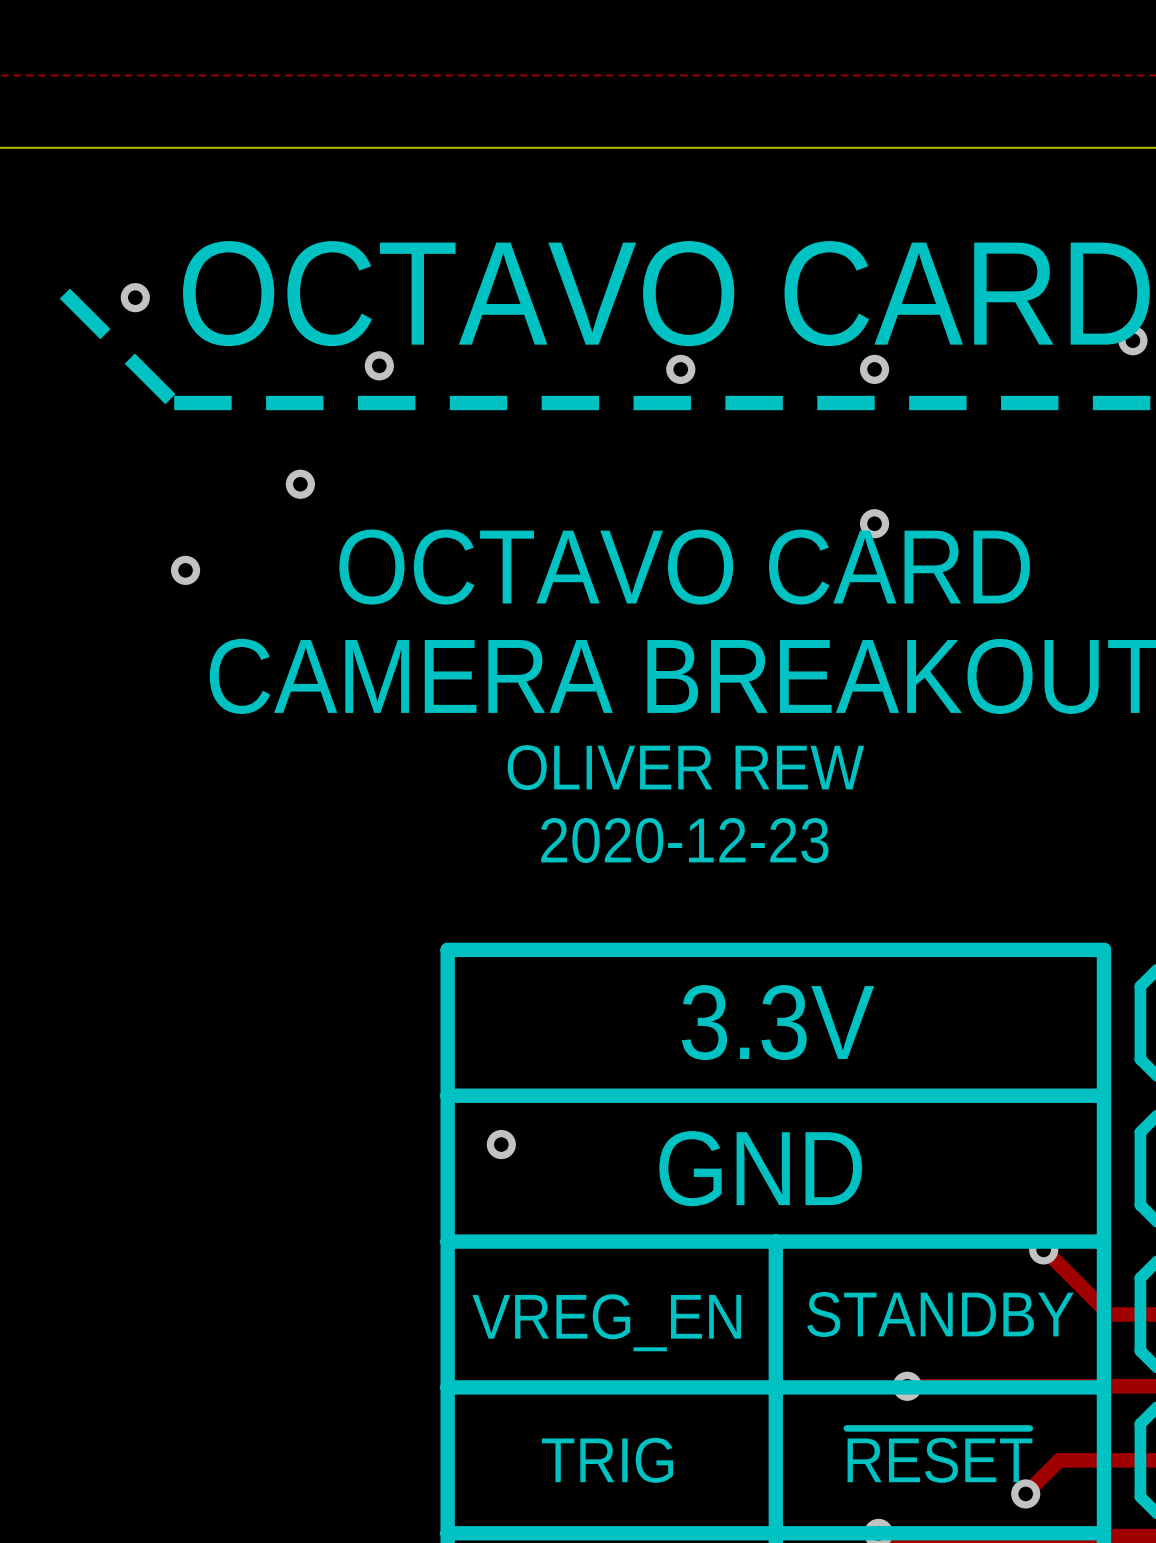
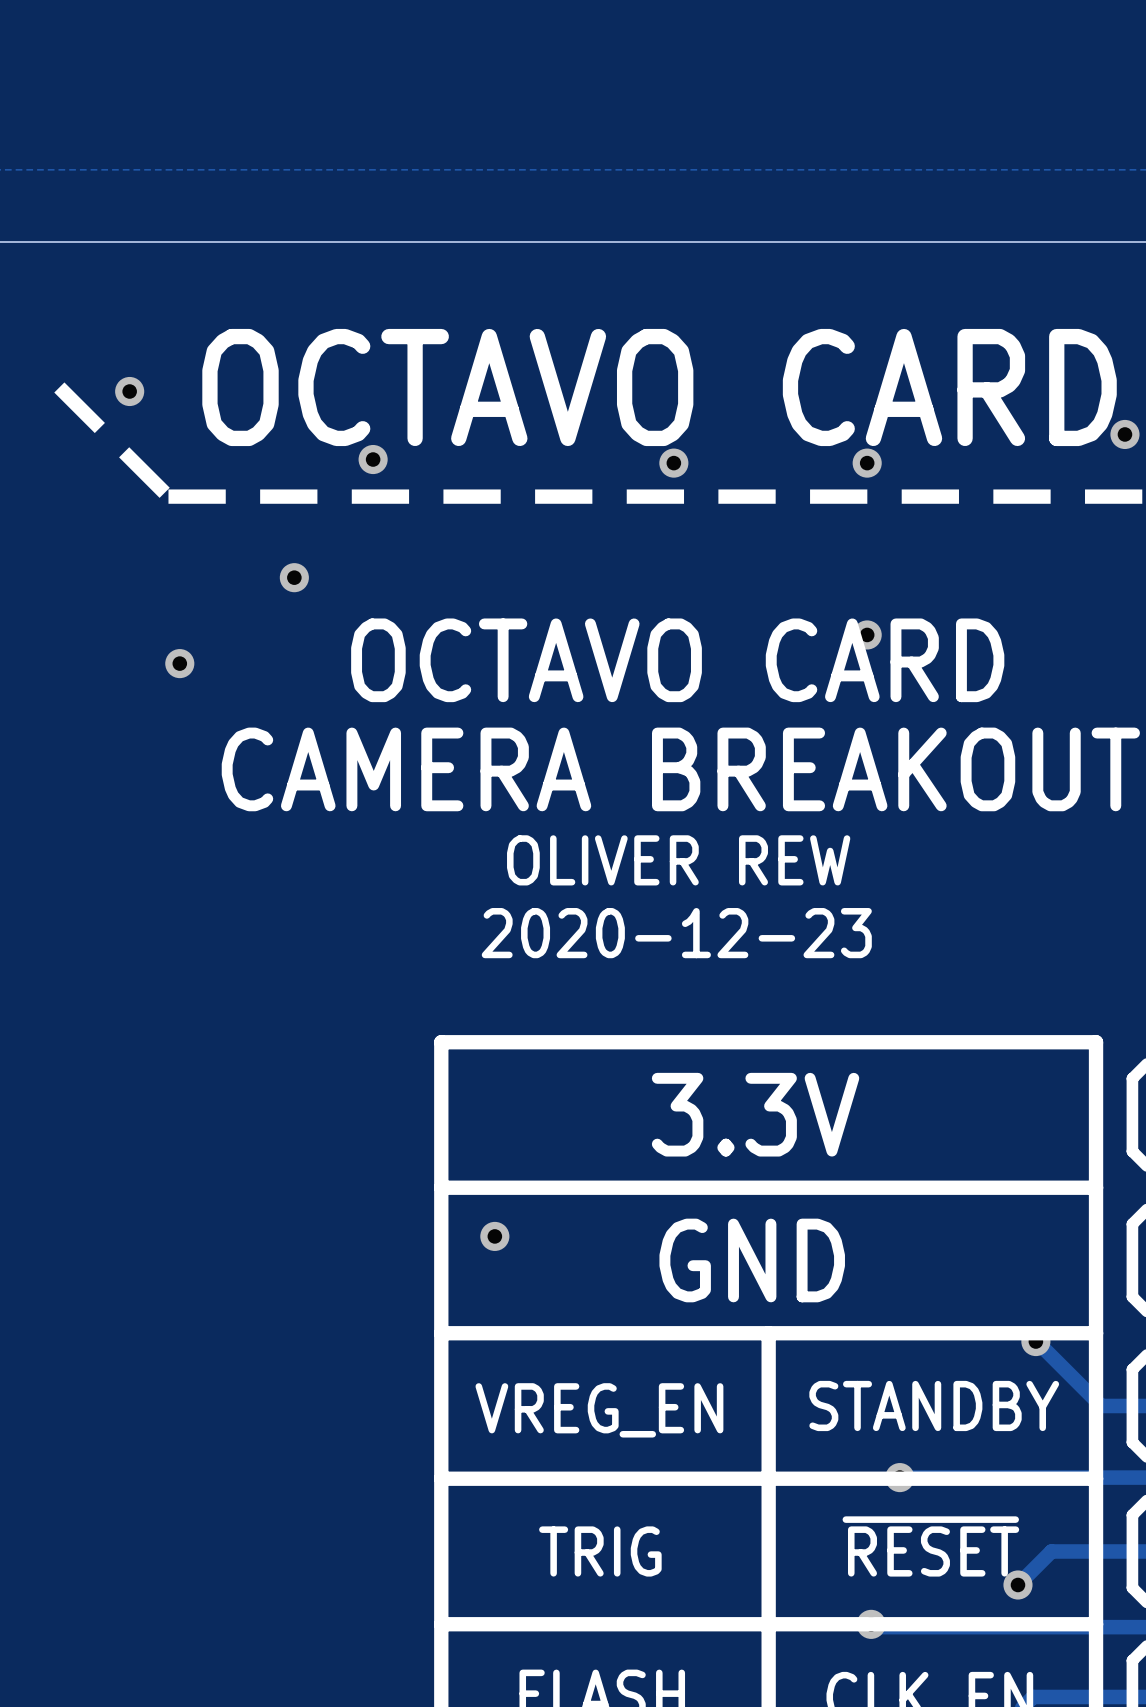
via position: (874, 523) -> (867, 634)

